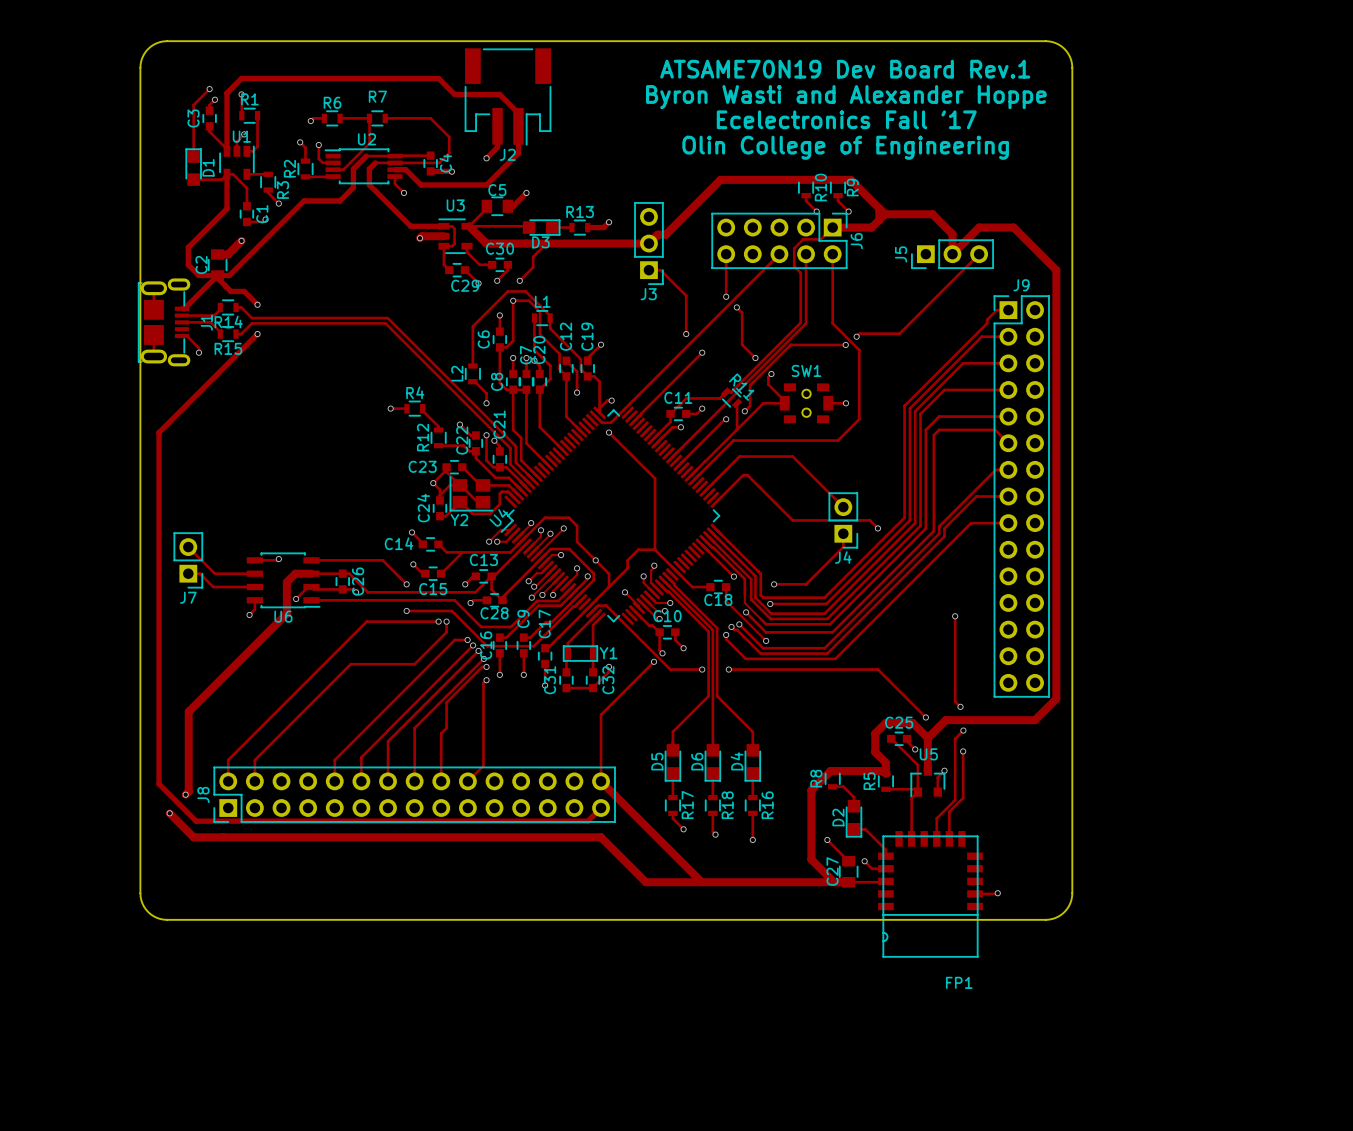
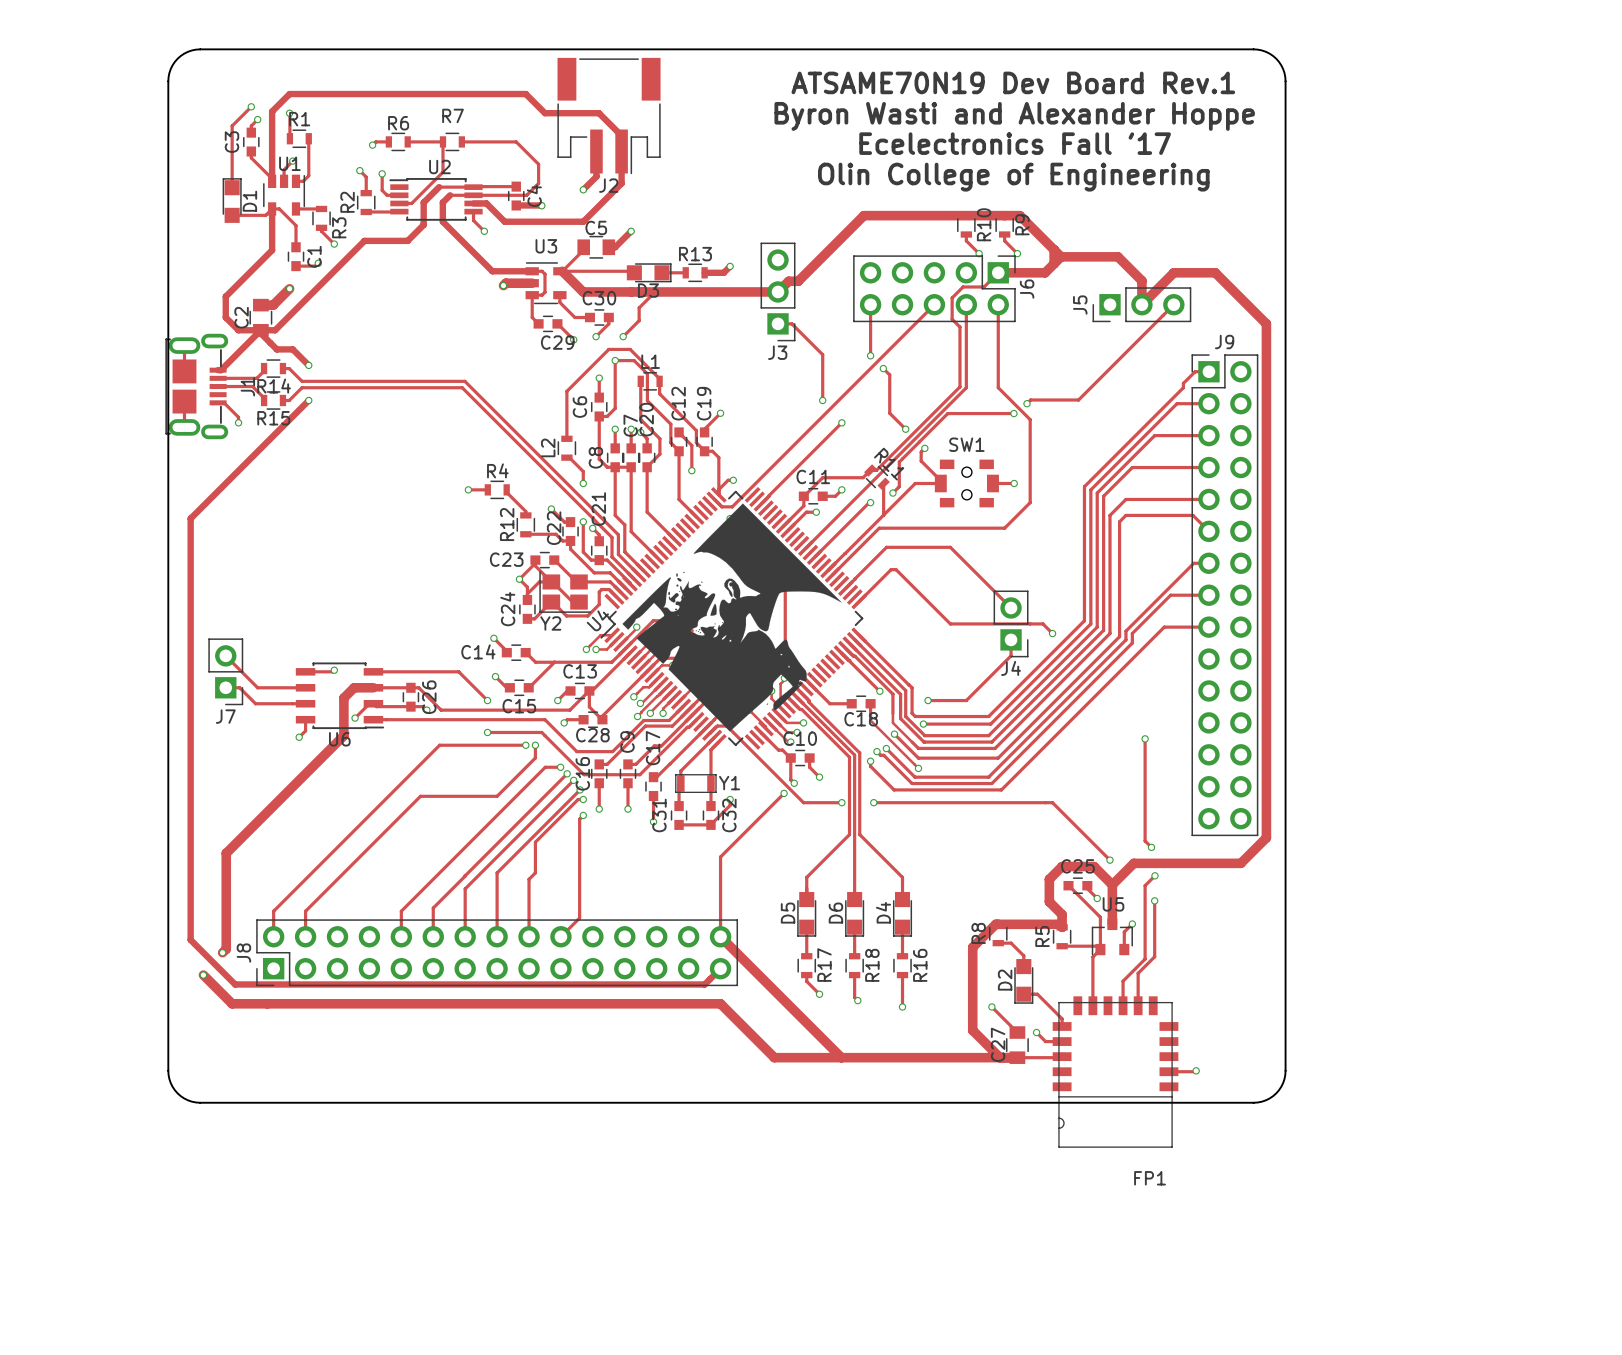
drawing: none -> [622, 503, 842, 732]

